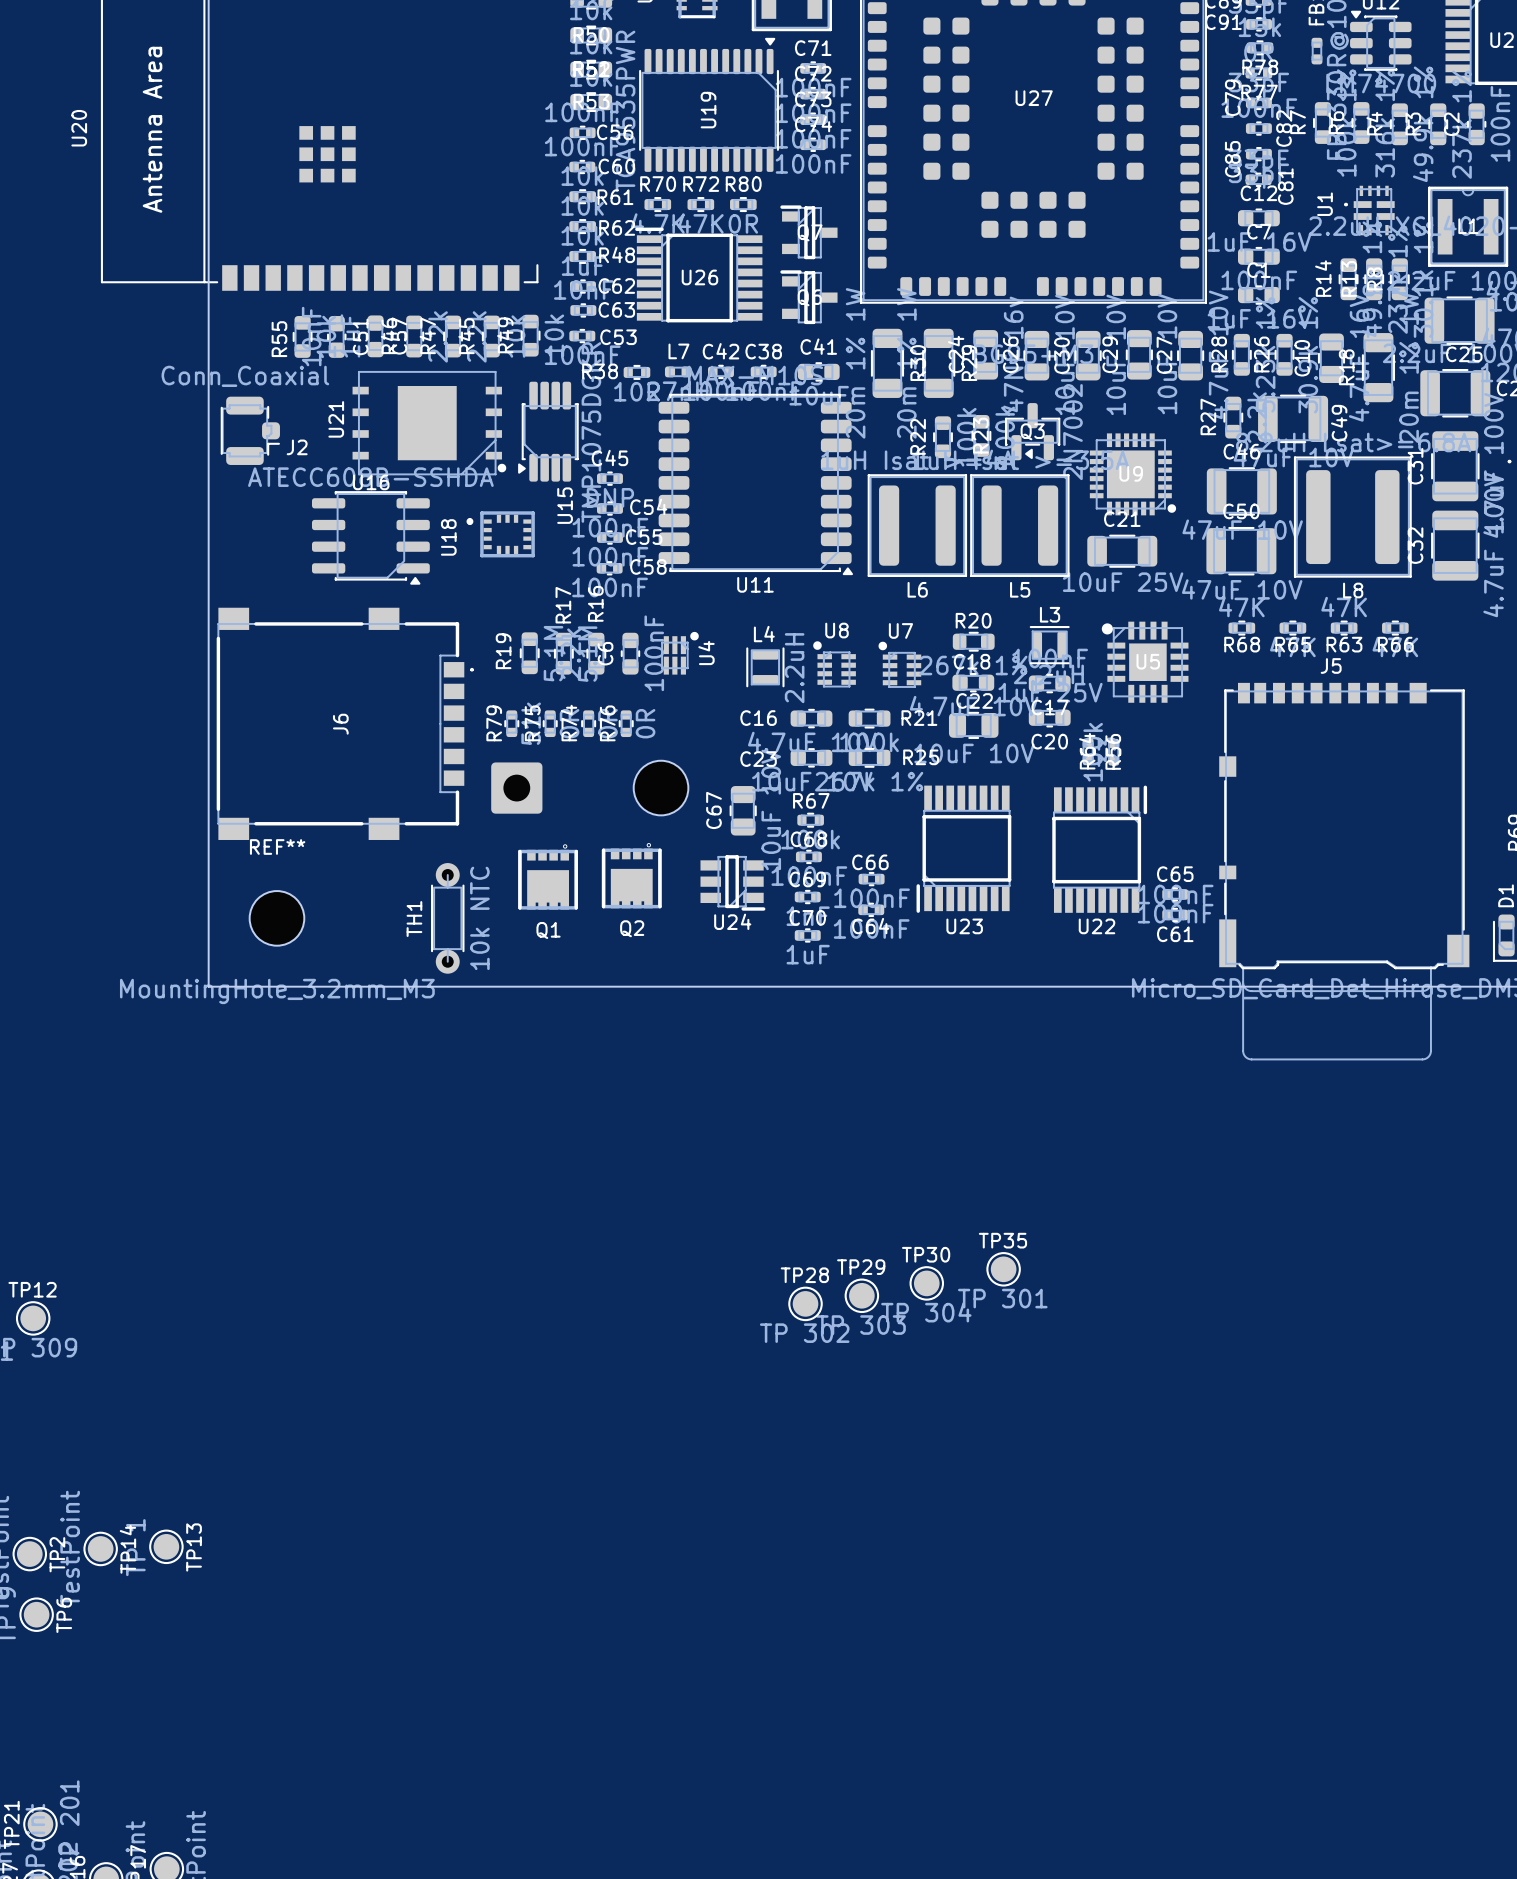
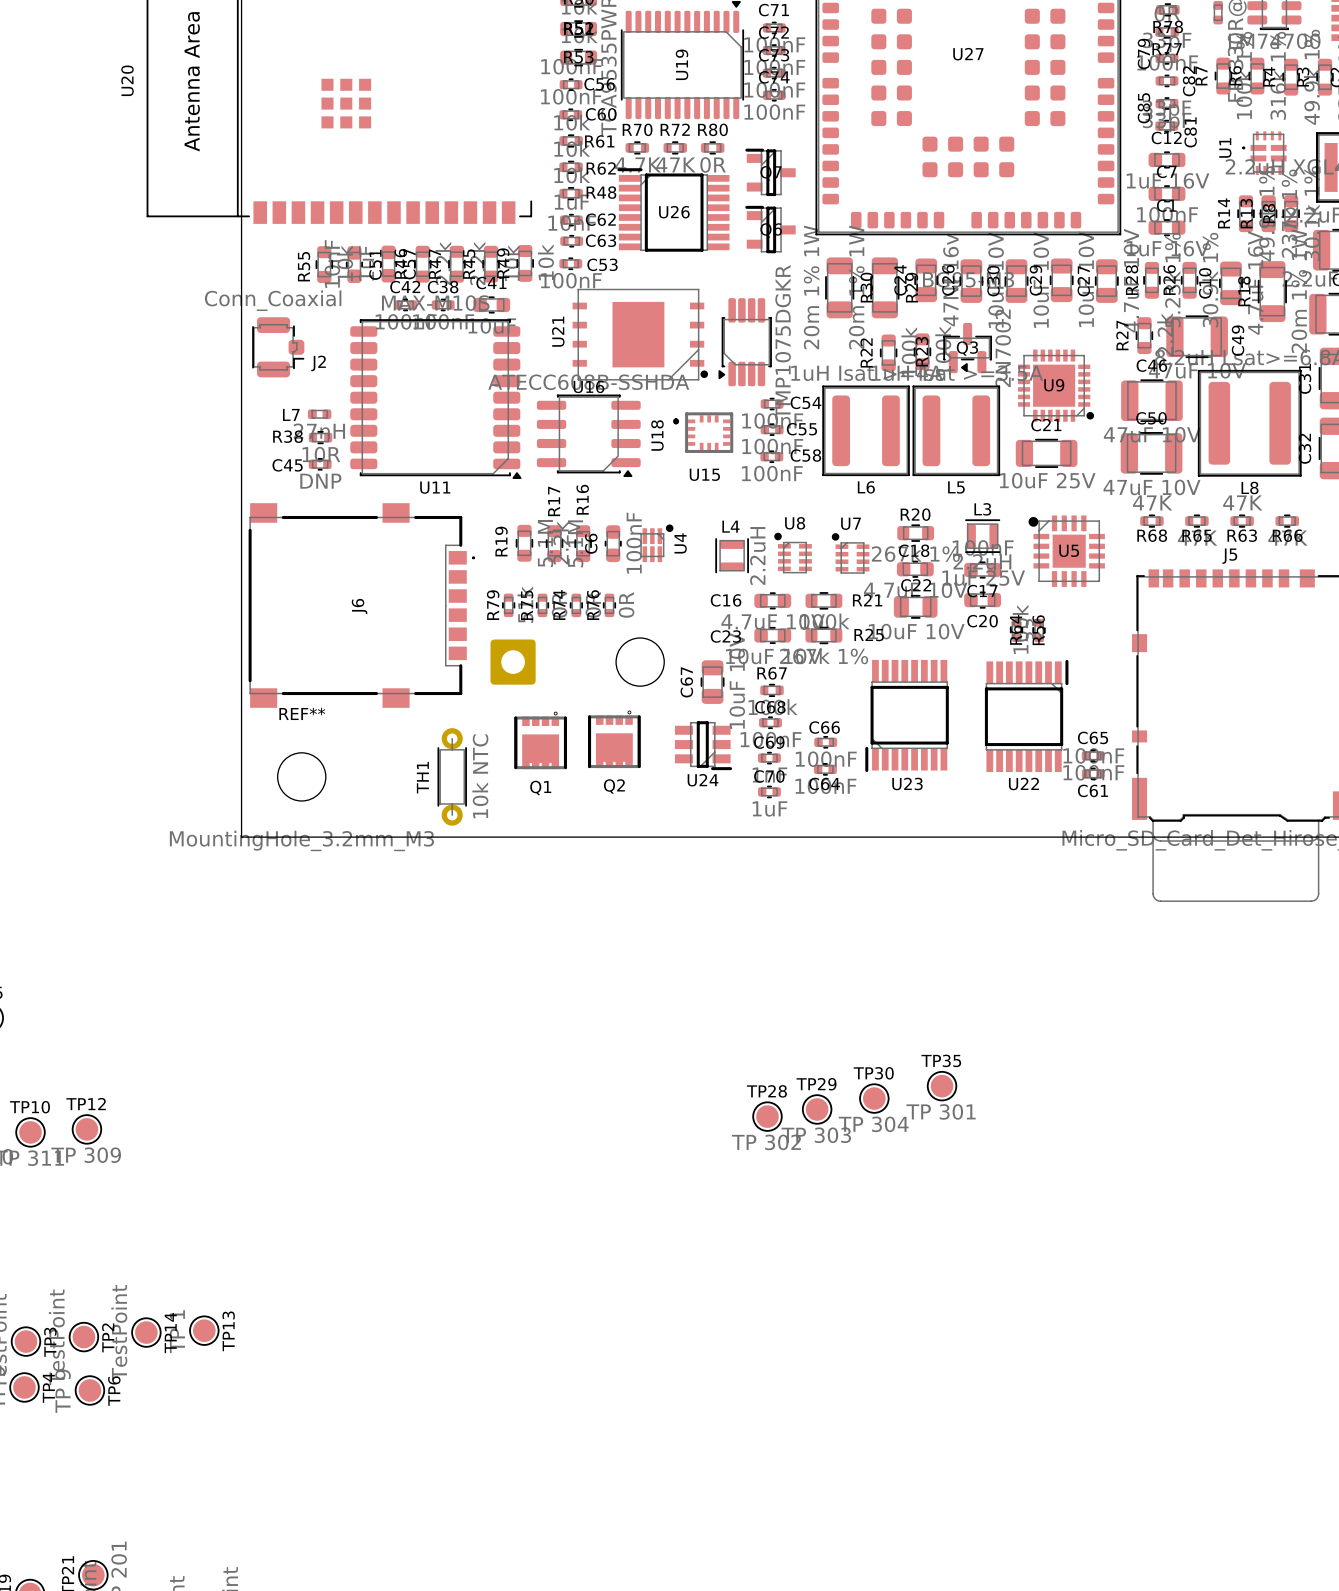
L7 name position: L7 (678, 351) -> L7 (291, 414)
L7 position: (678, 371) -> (319, 414)
C42 position: (720, 371) -> (405, 304)
C38 position: (763, 371) -> (443, 304)
C41 position: (818, 371) -> (491, 304)
R38 position: (636, 372) -> (320, 437)
U21 position: (429, 423) -> (640, 334)
U15 position: (548, 431) -> (745, 342)
C45 name position: C45 (609, 457) -> C45 (287, 465)
C45 position: (609, 478) -> (320, 464)
U11 position: (755, 484) -> (435, 399)
U15 name rotation: 0° (565, 505) -> 90° clockwise (704, 474)
U15 name position: U15 (565, 505) -> U15 (704, 474)
C54 position: (609, 508) -> (772, 404)
U18 position: (500, 534) -> (703, 432)
U16 position: (370, 537) -> (588, 435)
C55 position: (609, 537) -> (772, 429)
C58 position: (609, 568) -> (771, 456)

